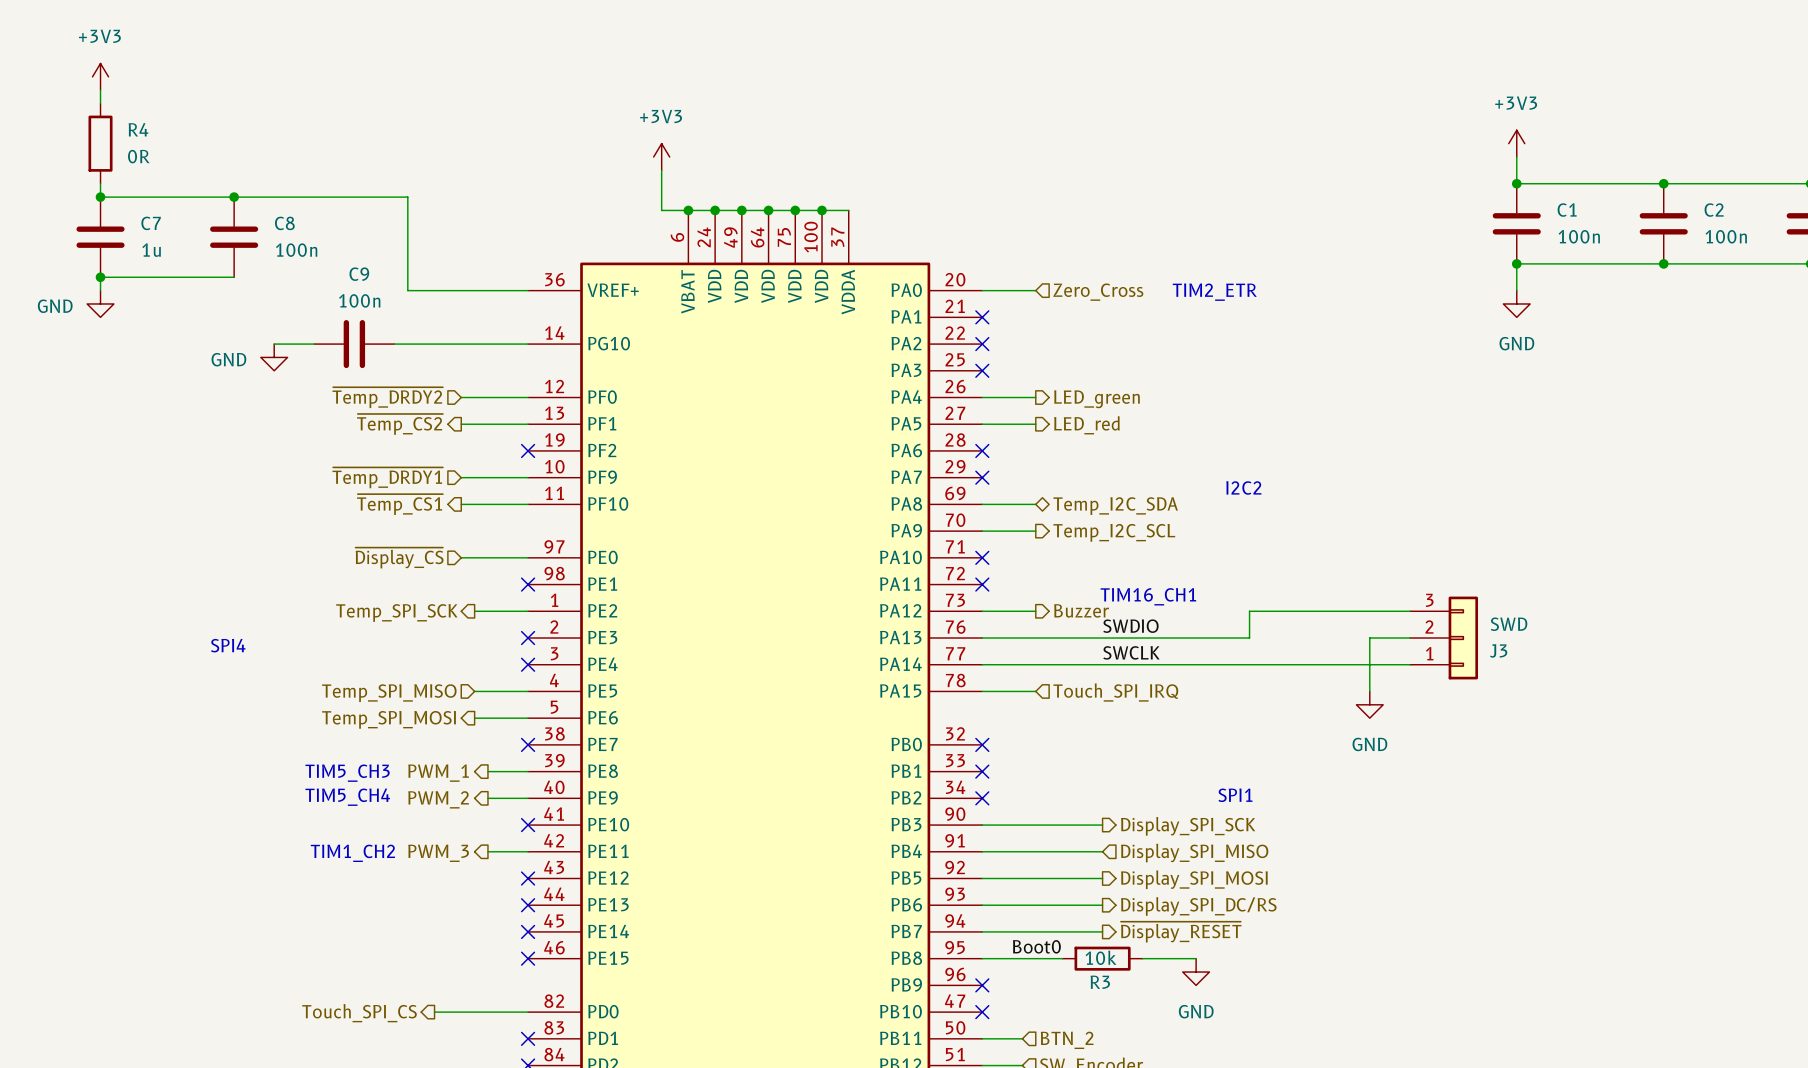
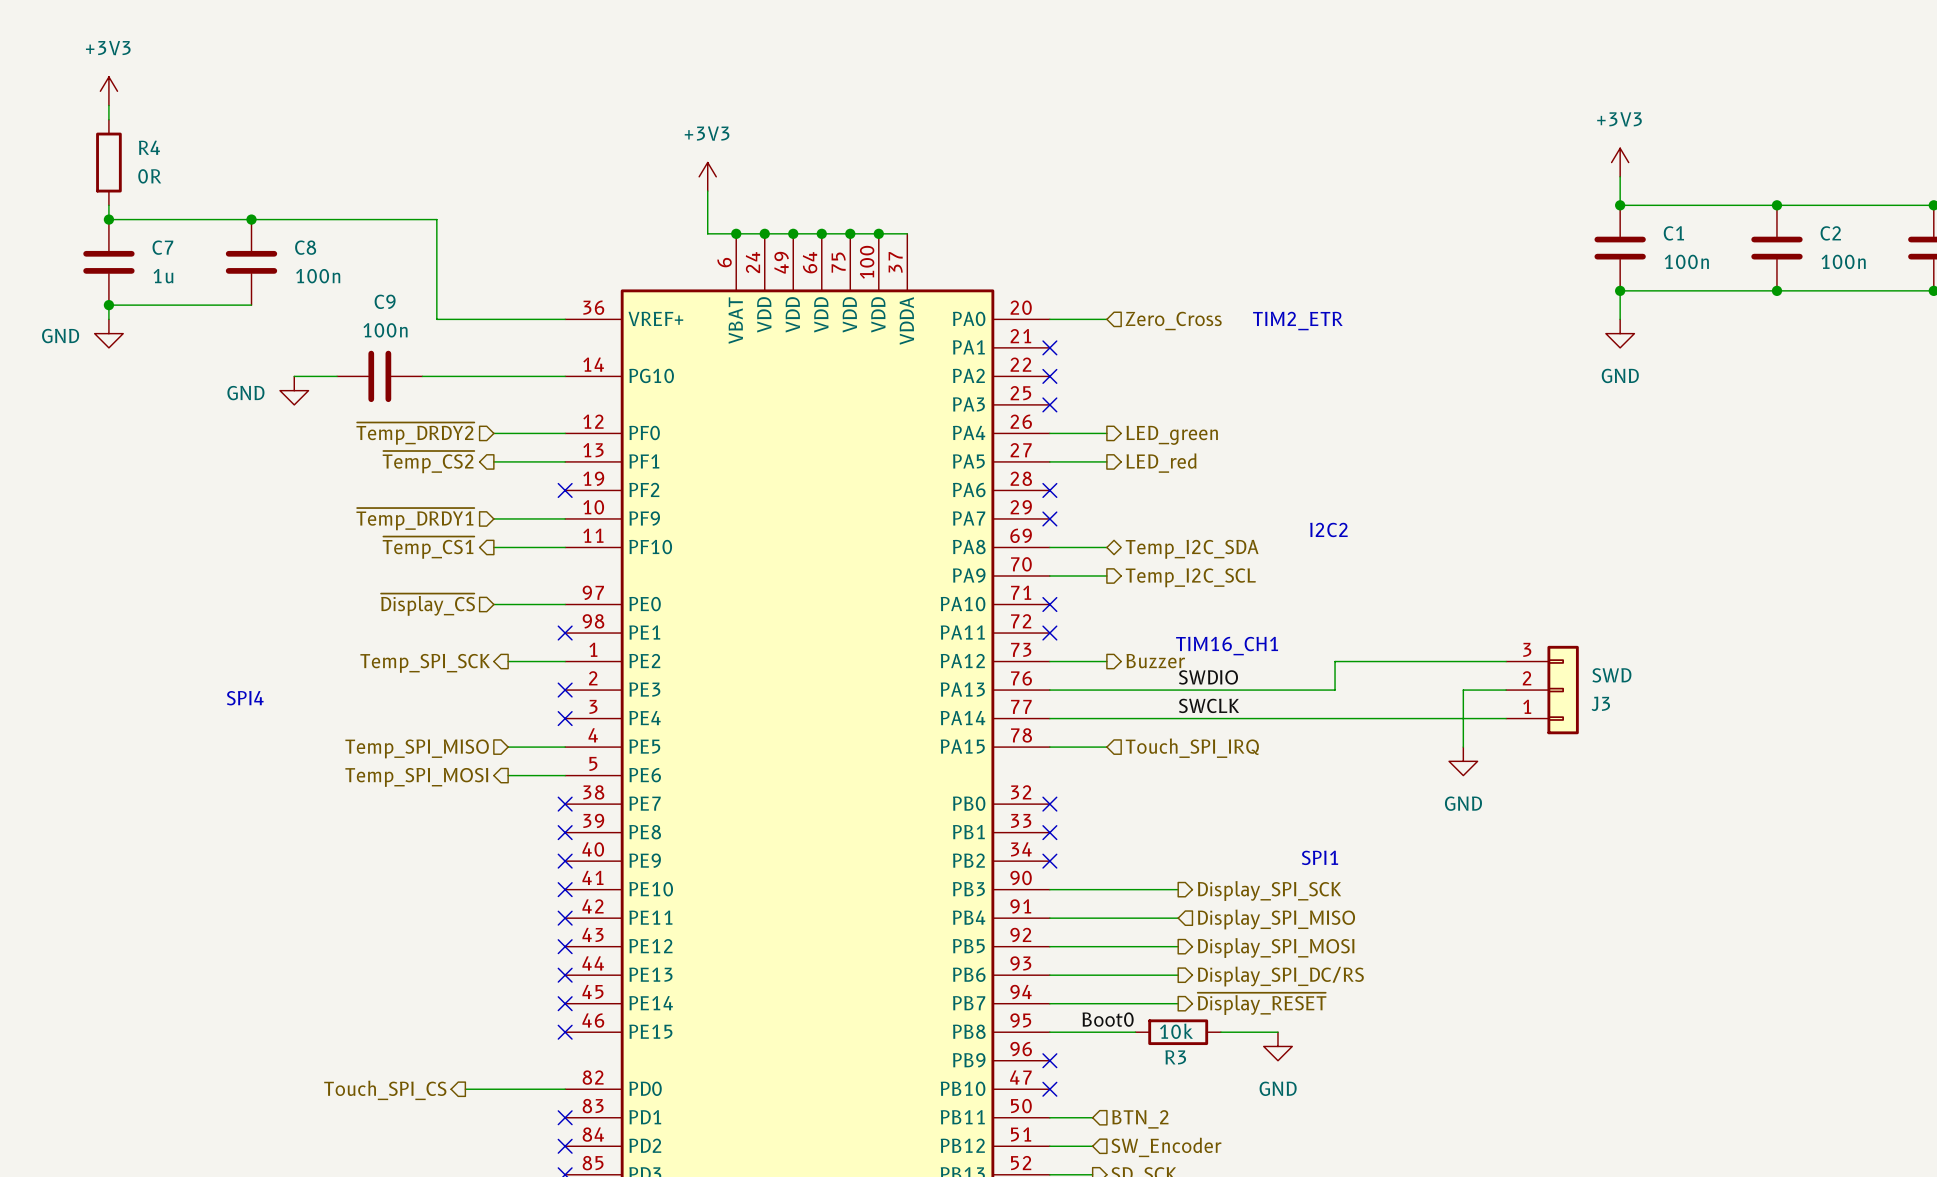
wire: (487, 771) (528, 771) -> none
no-connect mark: none -> (565, 832)
text: TIM5_CH3 (347, 773) -> none
hierarchical label: PWM_1 (438, 773) -> none
text: TIM5_CH4 (347, 797) -> none
wire: (487, 798) (528, 798) -> none
no-connect mark: none -> (565, 861)
hierarchical label: PWM_2 (438, 799) -> none
wire: (487, 851) (528, 851) -> none
no-connect mark: none -> (565, 918)
text: TIM1_CH2 (352, 853) -> none
hierarchical label: PWM_3 (438, 853) -> none

